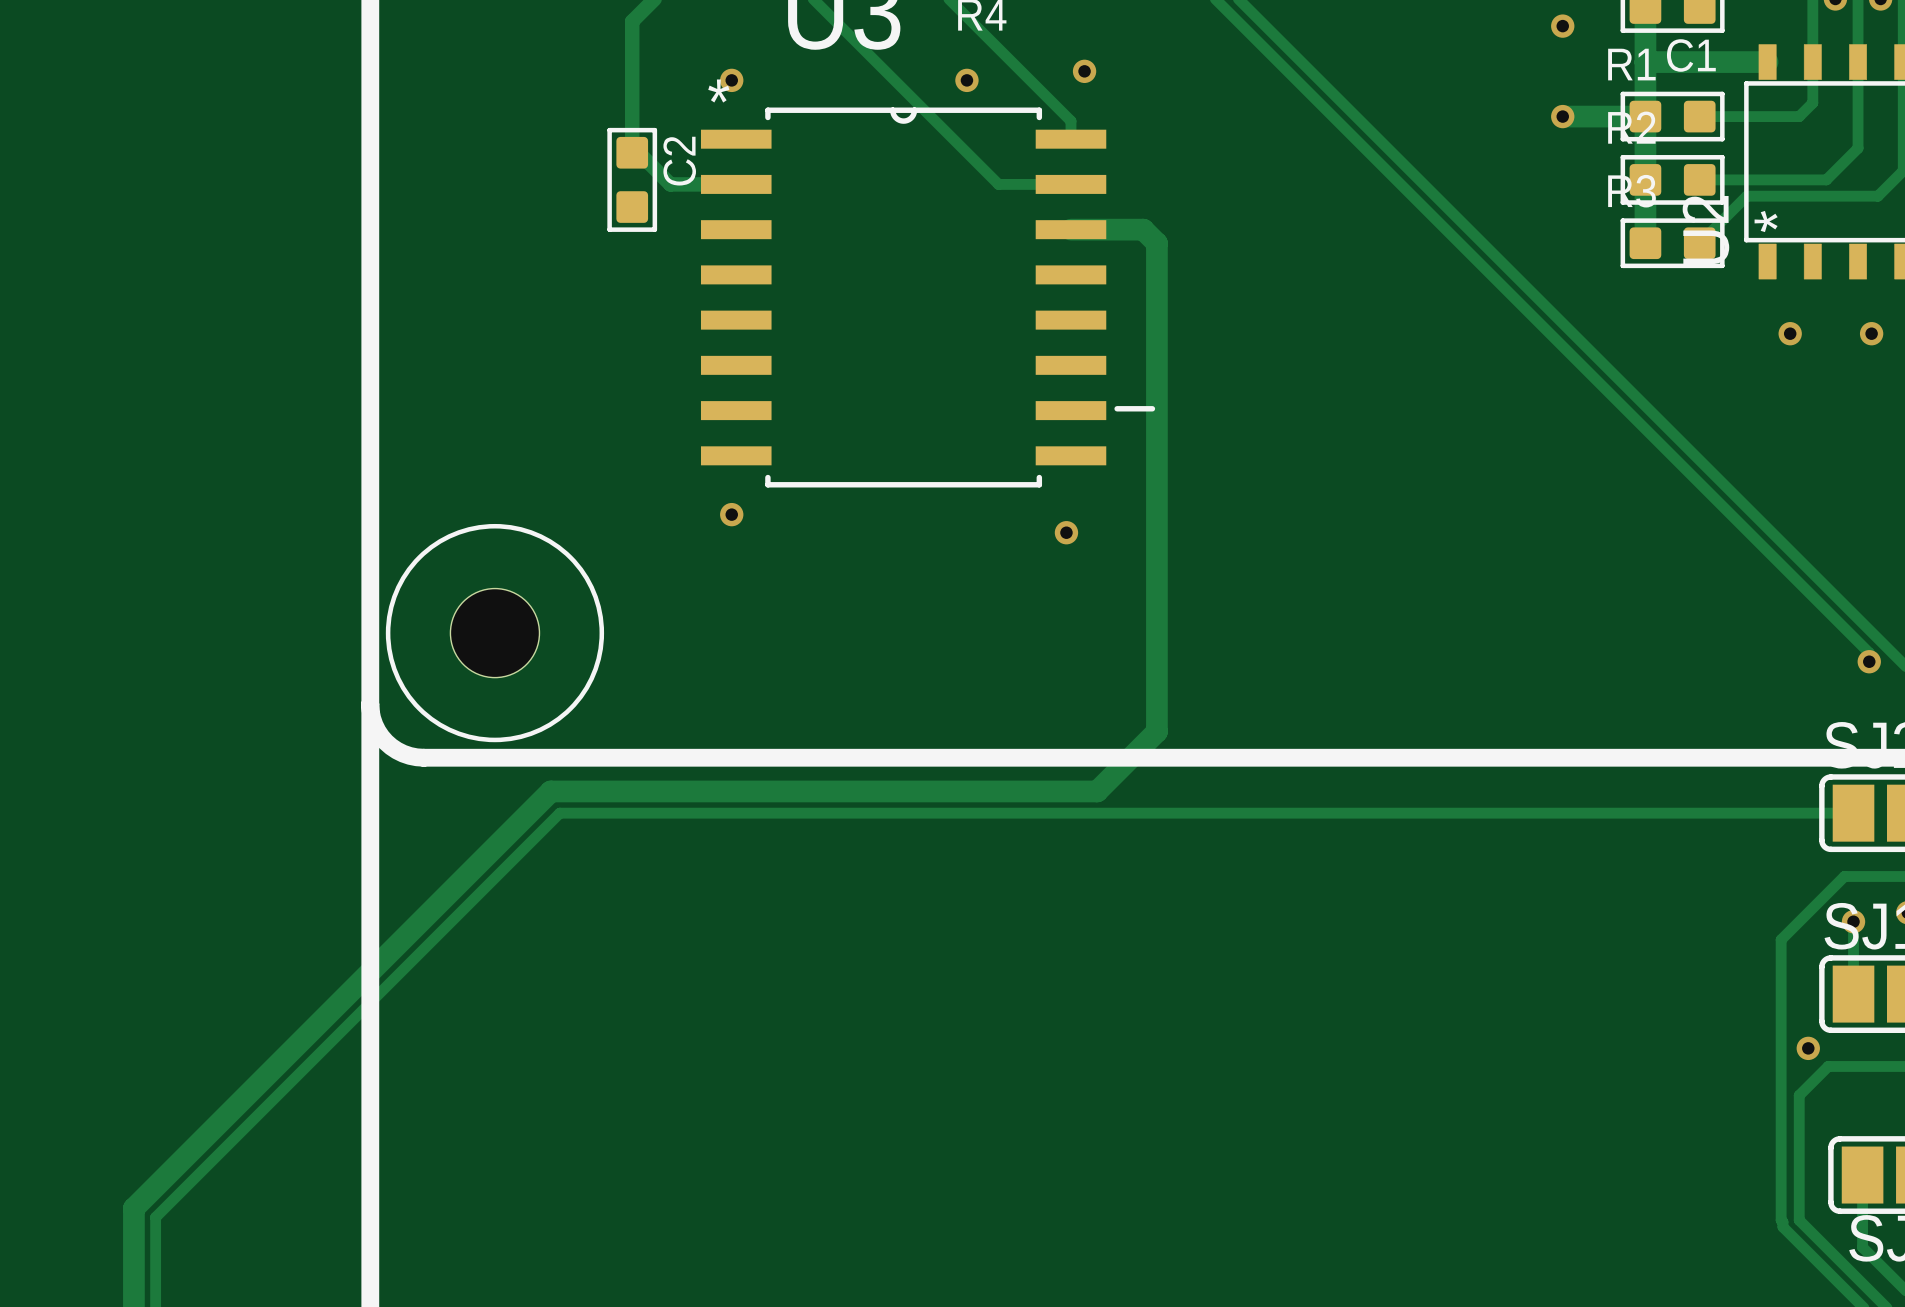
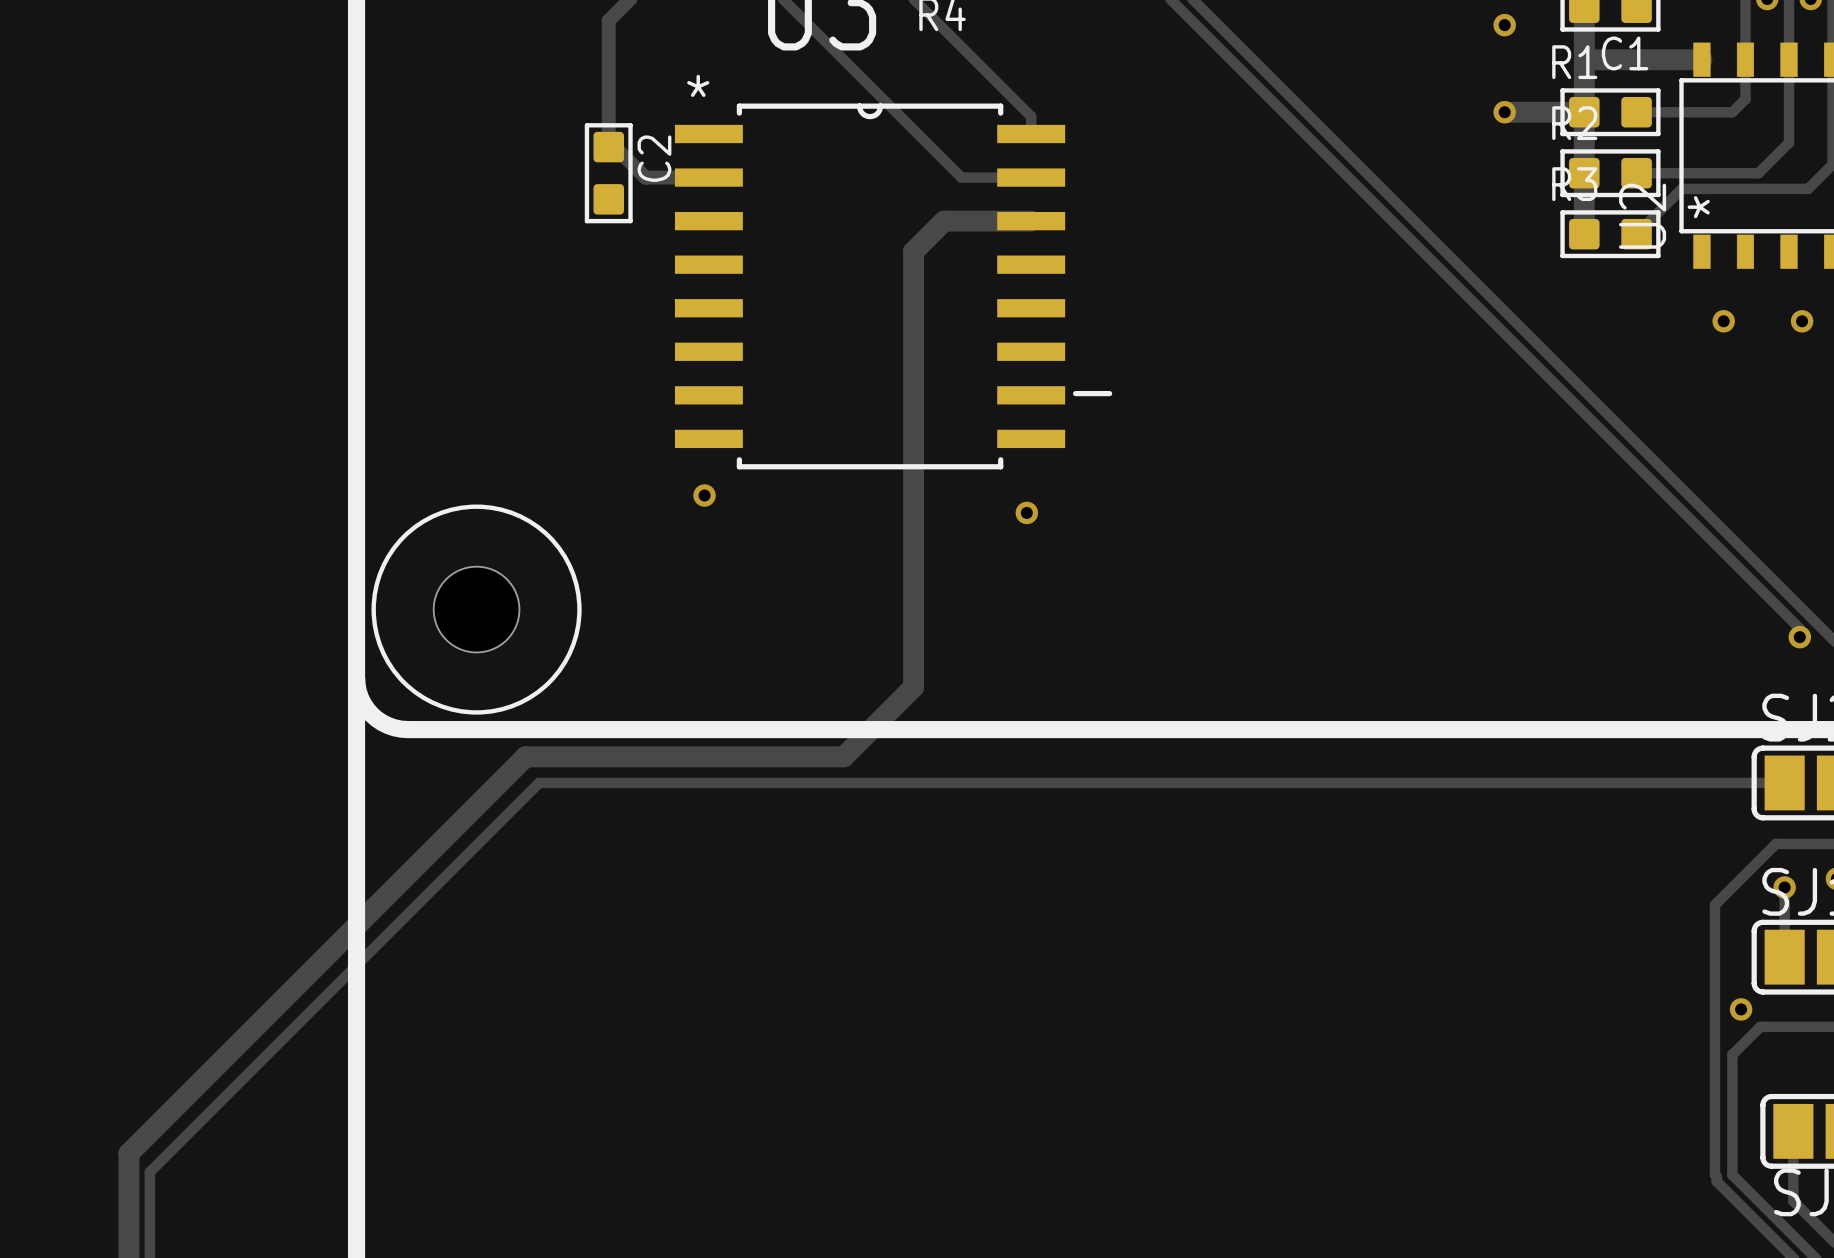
via: (1084, 71) -> none
via: (731, 80) -> none
via: (966, 80) -> none
track: (1070, 229) (1143, 229) (1156, 243) (1156, 731) (1097, 791) (550, 791) (133, 1208) -> (1031, 221) (944, 221) (913, 251) (913, 687) (843, 756) (525, 756) (128, 1153) (128, 1163)

